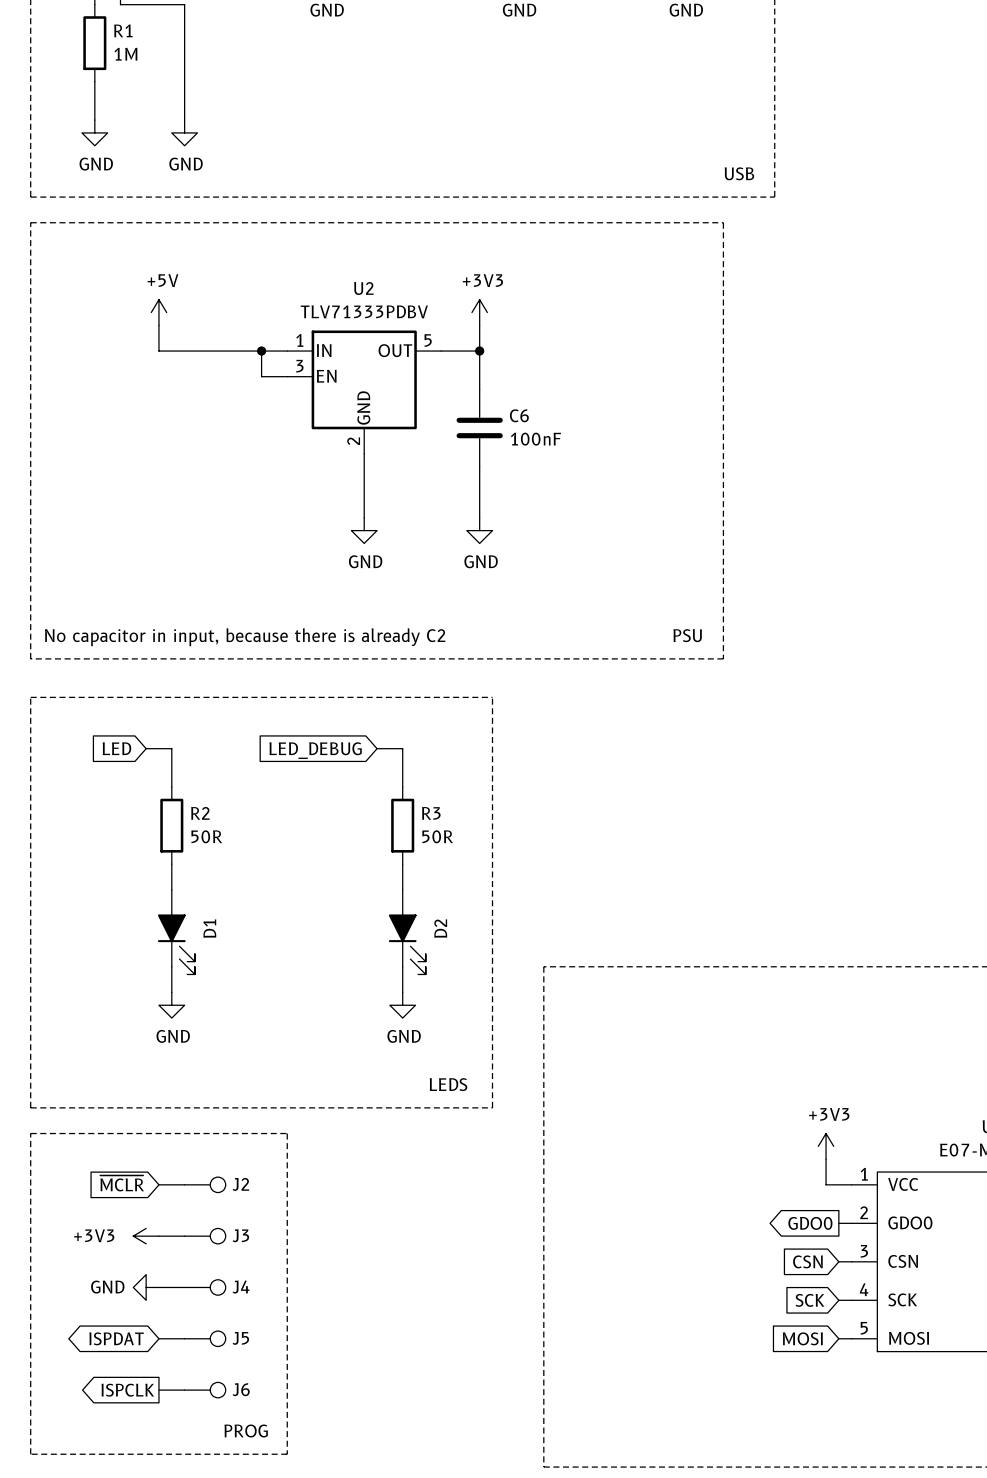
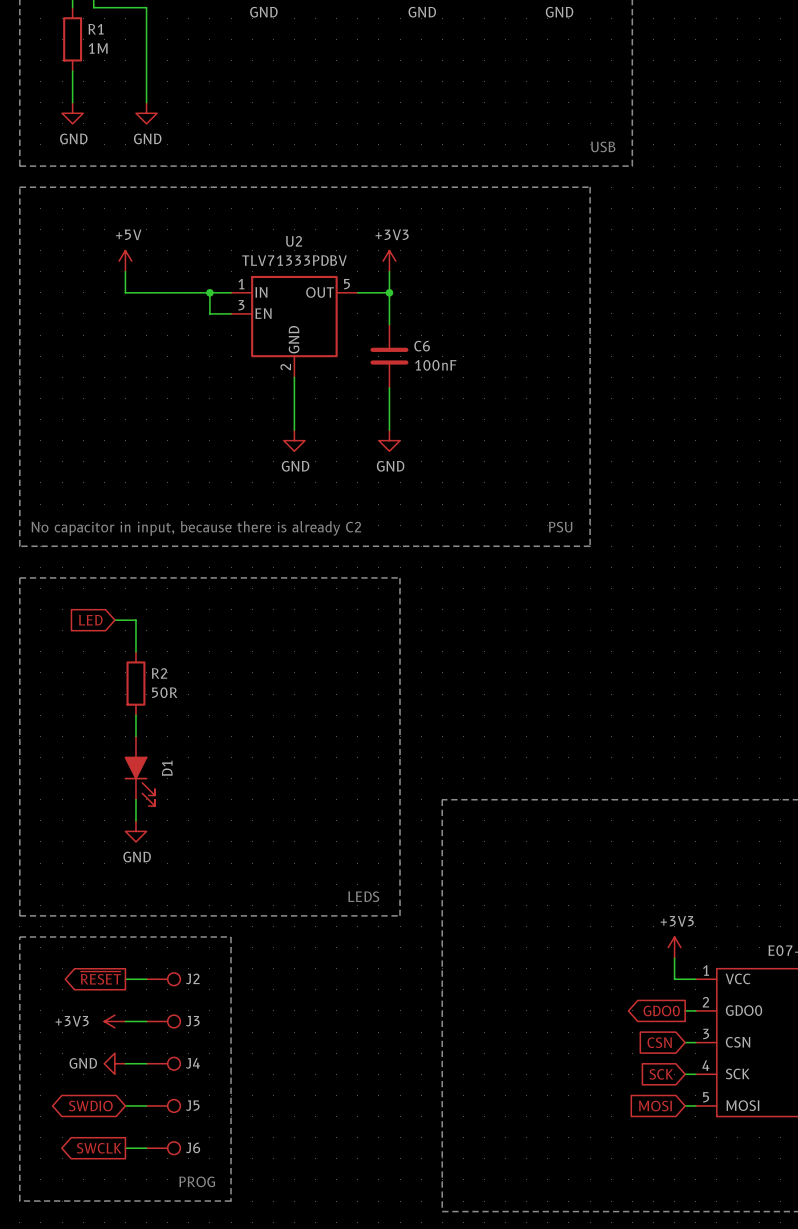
wire: (377, 748) (402, 748) (402, 787) -> none
global label: LED_DEBUG (315, 750) -> none
R3: 50R (402, 825) -> none
wire: (402, 864) (402, 889) -> none
D2: (407, 932) -> none
wire: (402, 966) (402, 992) -> none
power symbol: GND (402, 1005) -> none
global label shape: input (122, 1183) -> output (100, 978)
global label: ~{MCLR} (122, 1183) -> ~{RESET} (100, 978)
global label: ISPDAT (116, 1338) -> SWDIO (90, 1106)
global label: ISPCLK (127, 1390) -> SWCLK (99, 1148)

